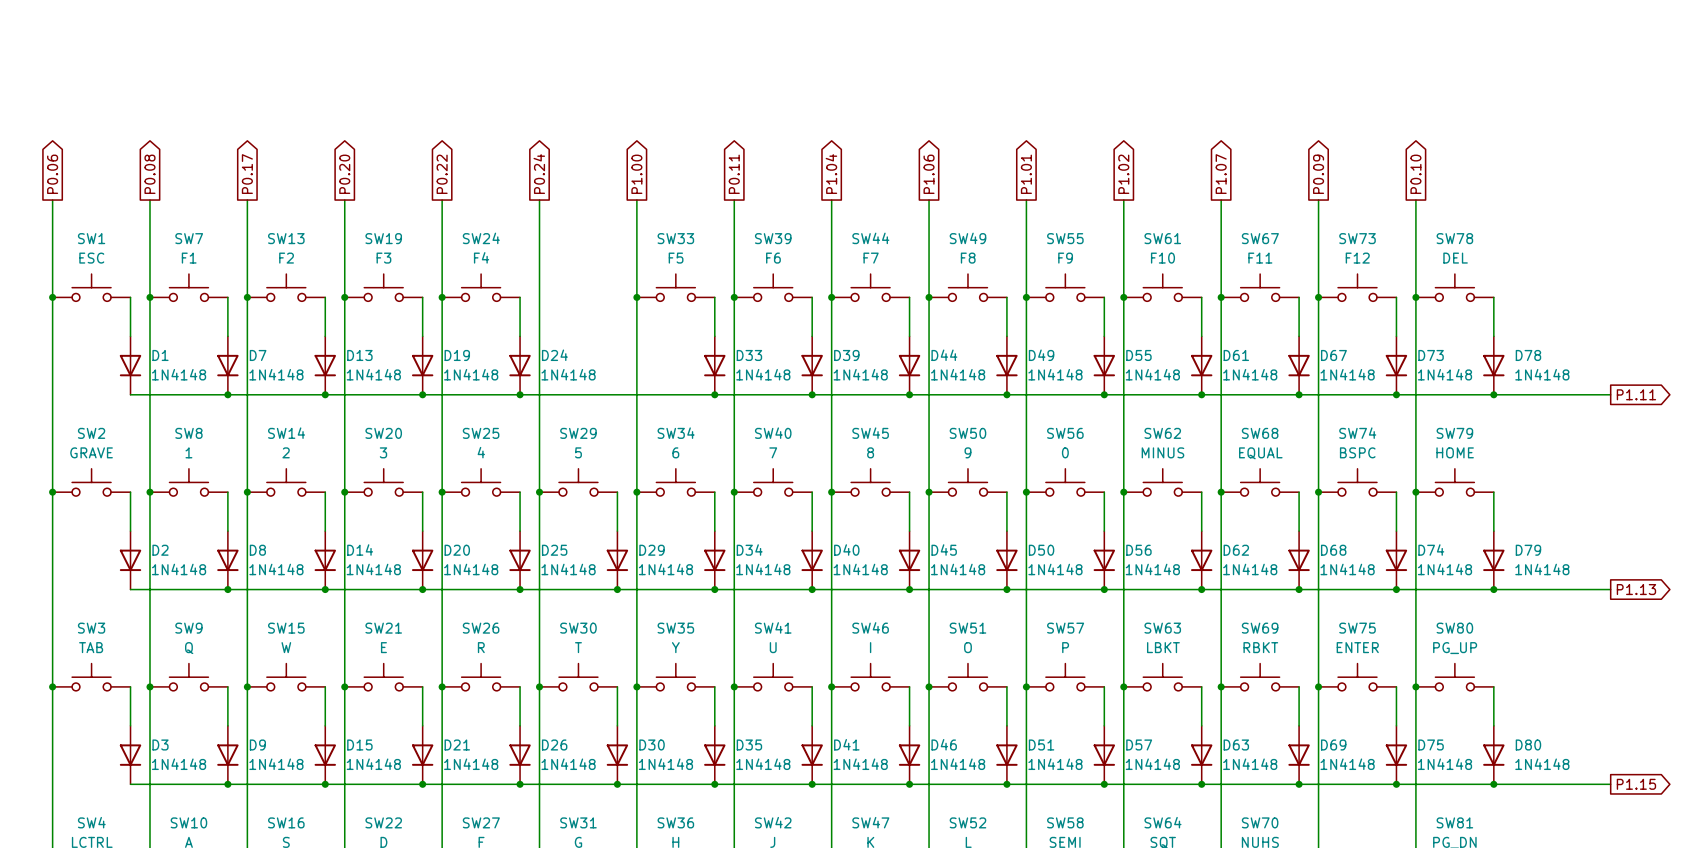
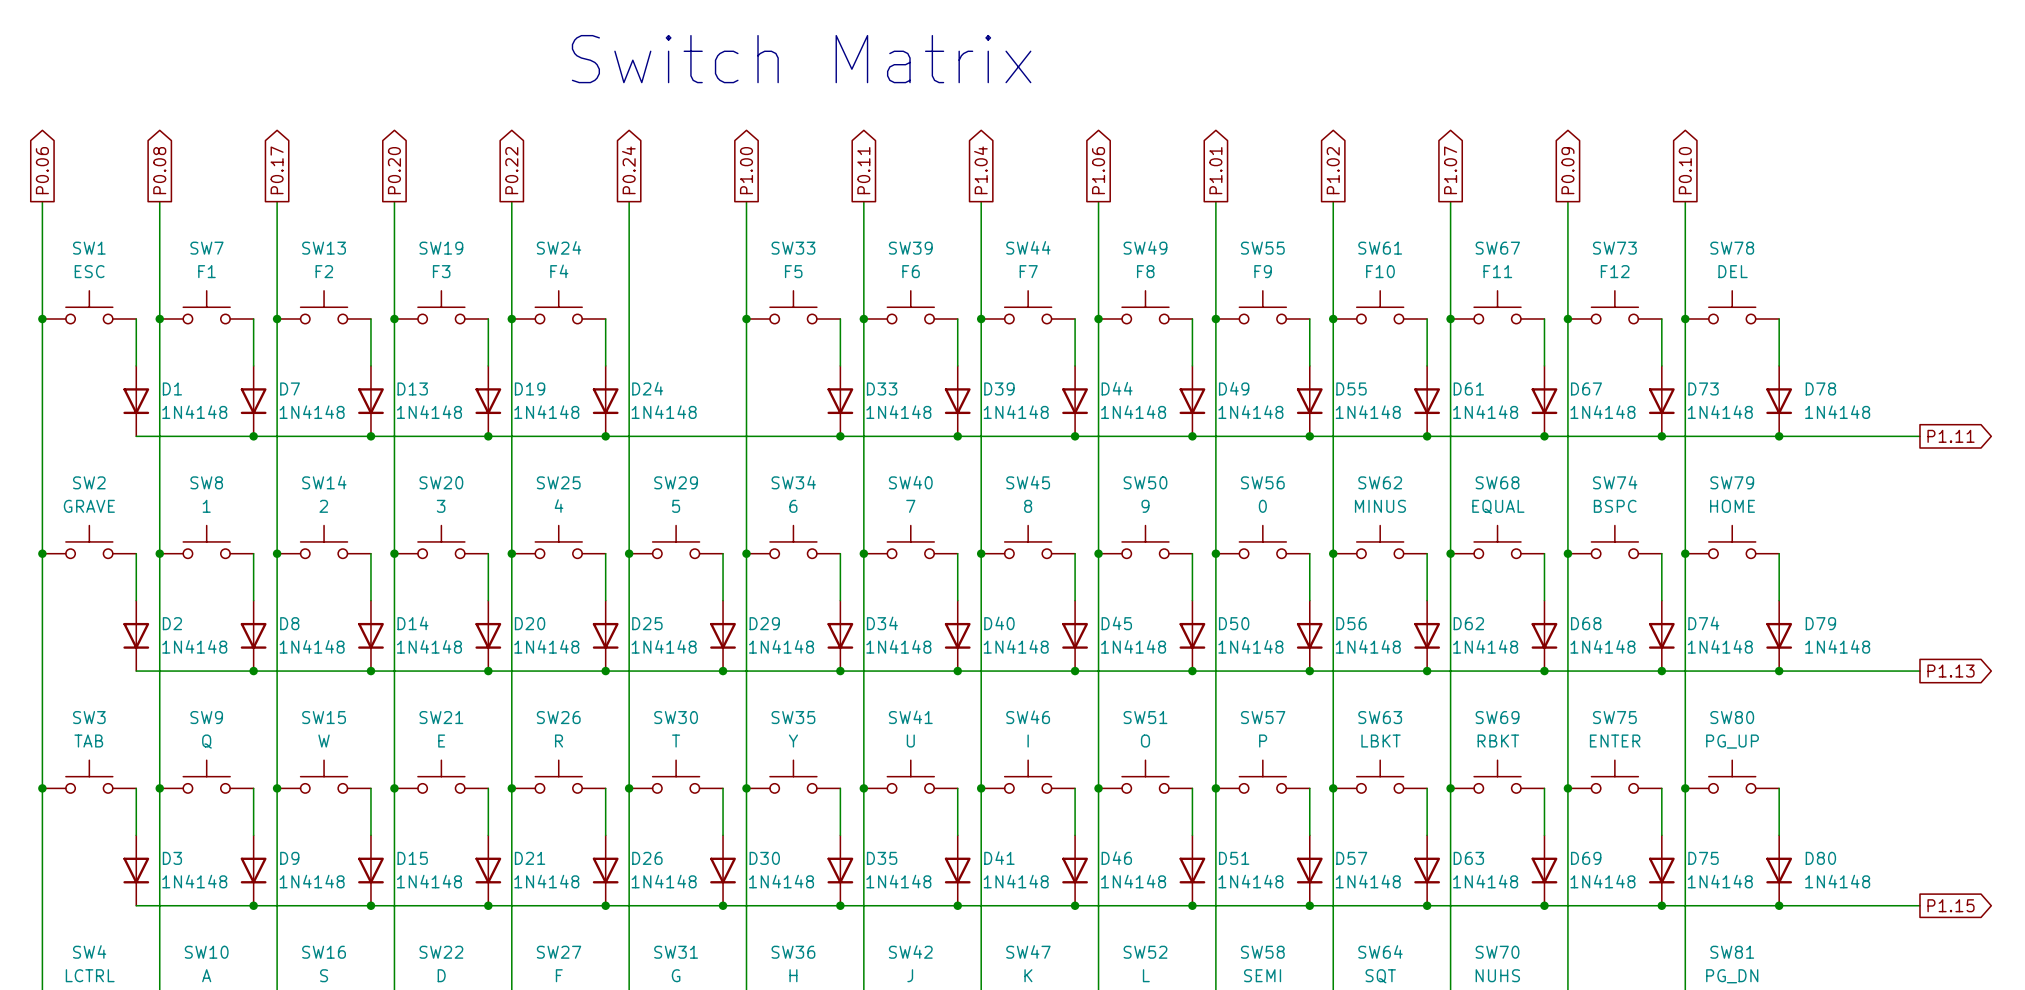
text: none -> Switch Matrix (801, 59)

